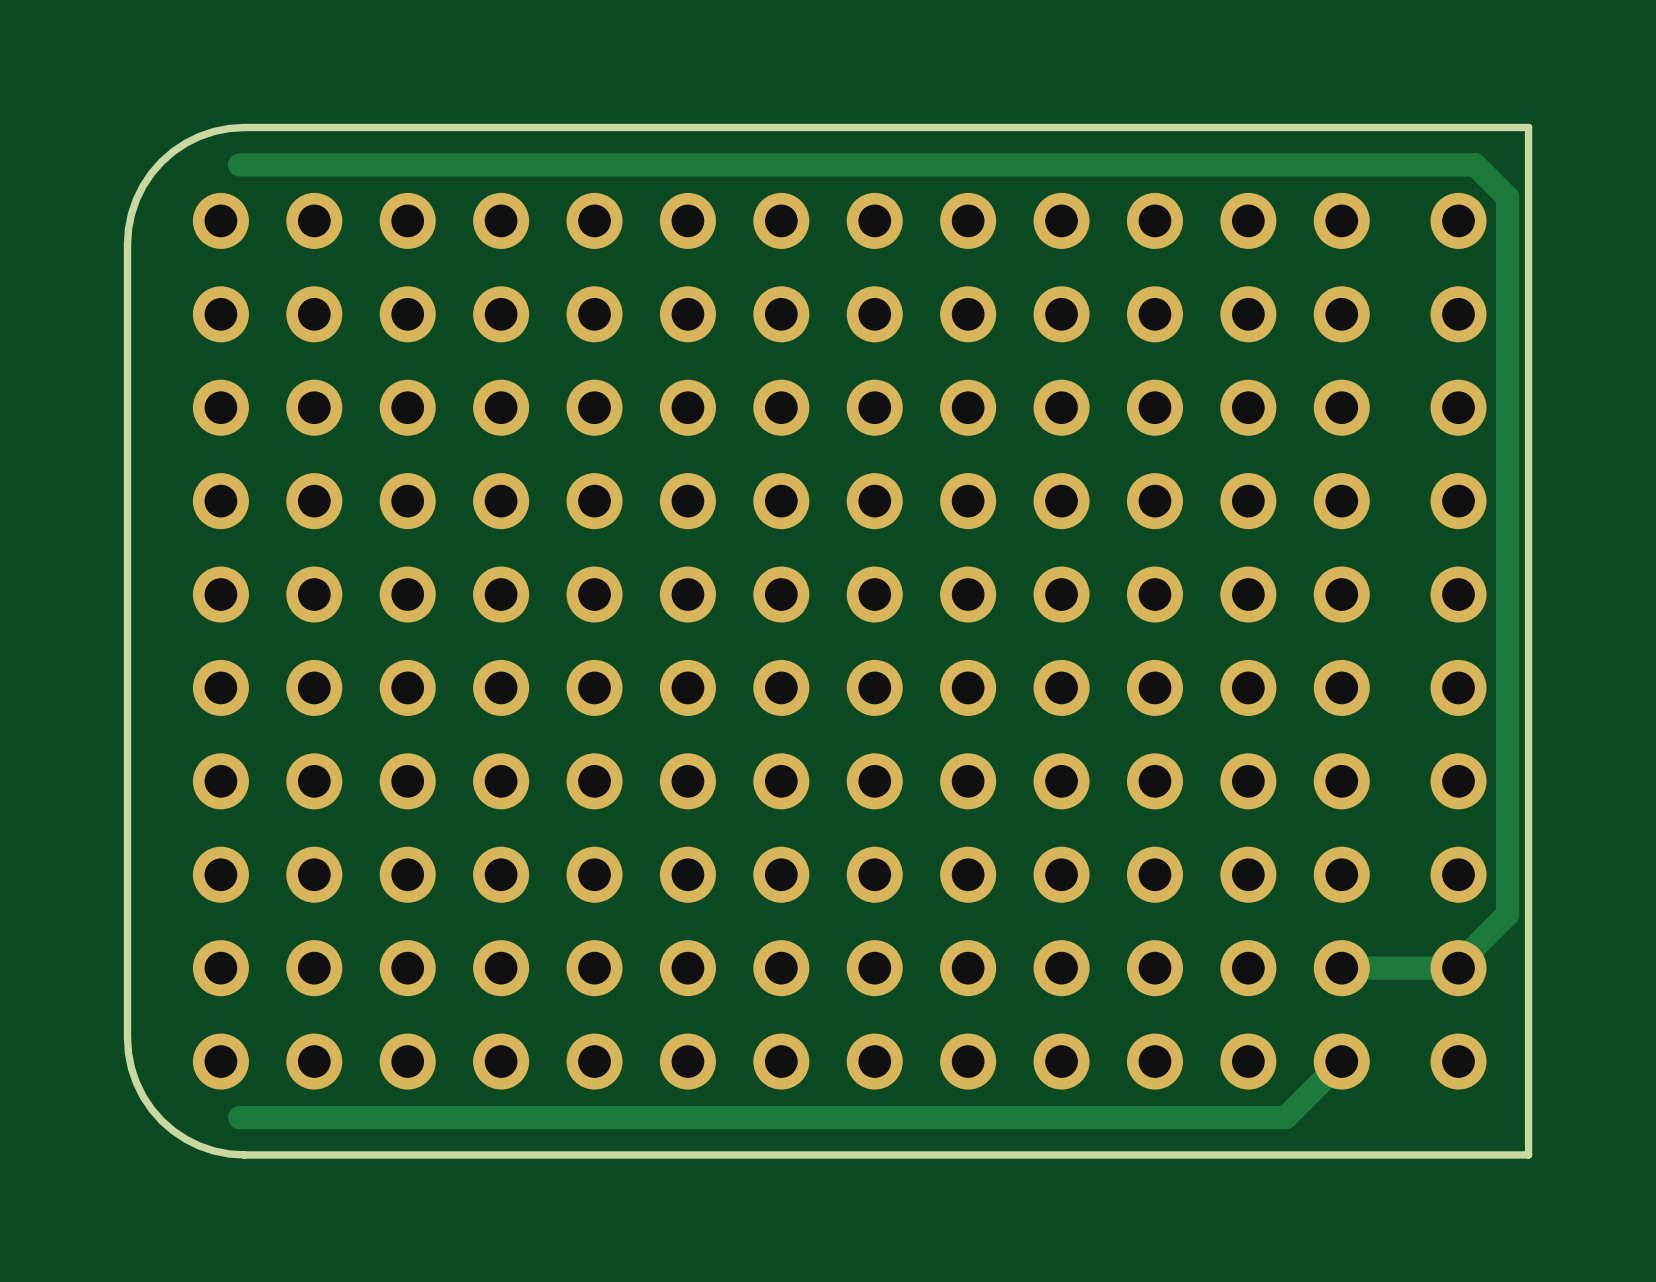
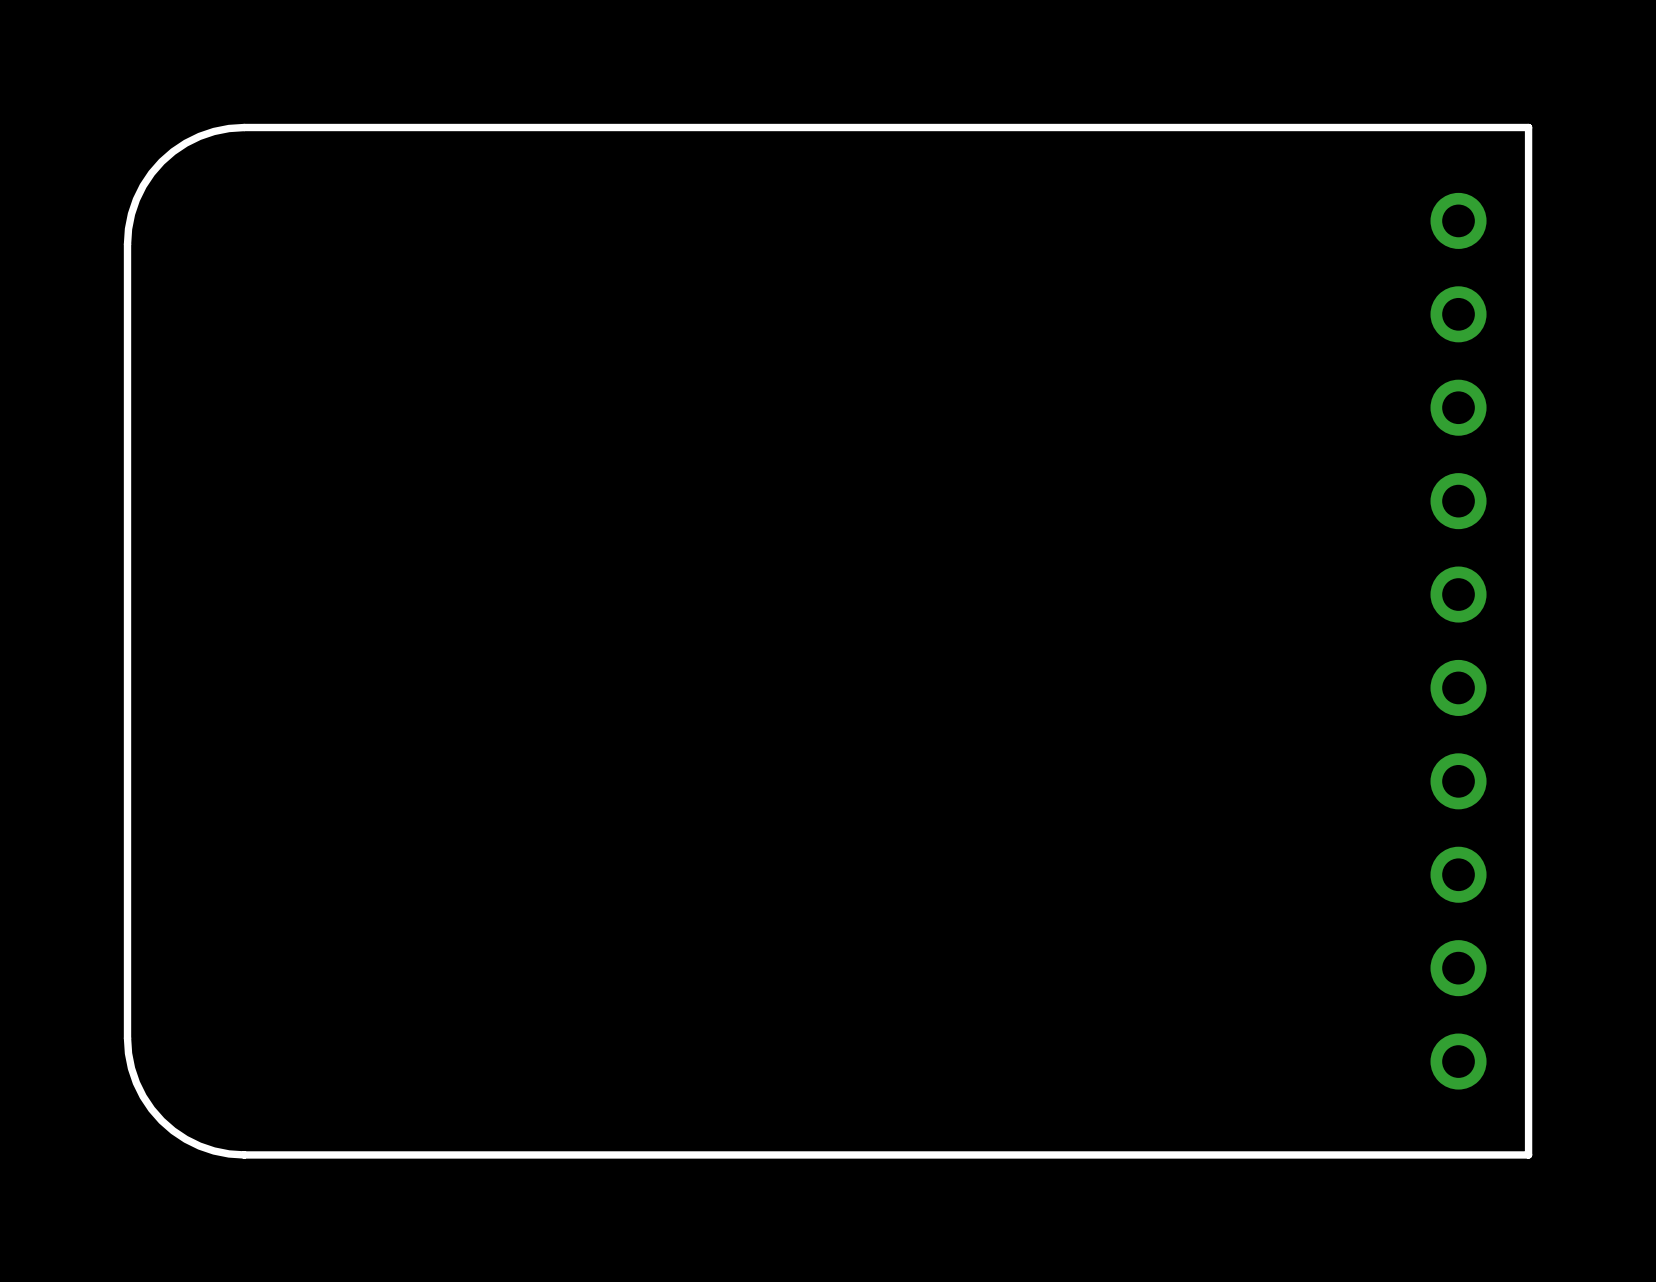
track: (239, 164) (1475, 164) (1507, 197) (1507, 914) (1453, 968) (1341, 968) -> none
part: (220, 641) -> none
part: (314, 641) -> none
part: (407, 641) -> none
part: (501, 641) -> none
part: (594, 641) -> none
part: (687, 641) -> none
part: (781, 641) -> none
part: (874, 641) -> none
part: (968, 641) -> none
part: (1061, 641) -> none
part: (1154, 641) -> none
part: (1248, 641) -> none
part: (1341, 641) -> none
track: (1341, 1061) (1285, 1117) (239, 1117) -> none

